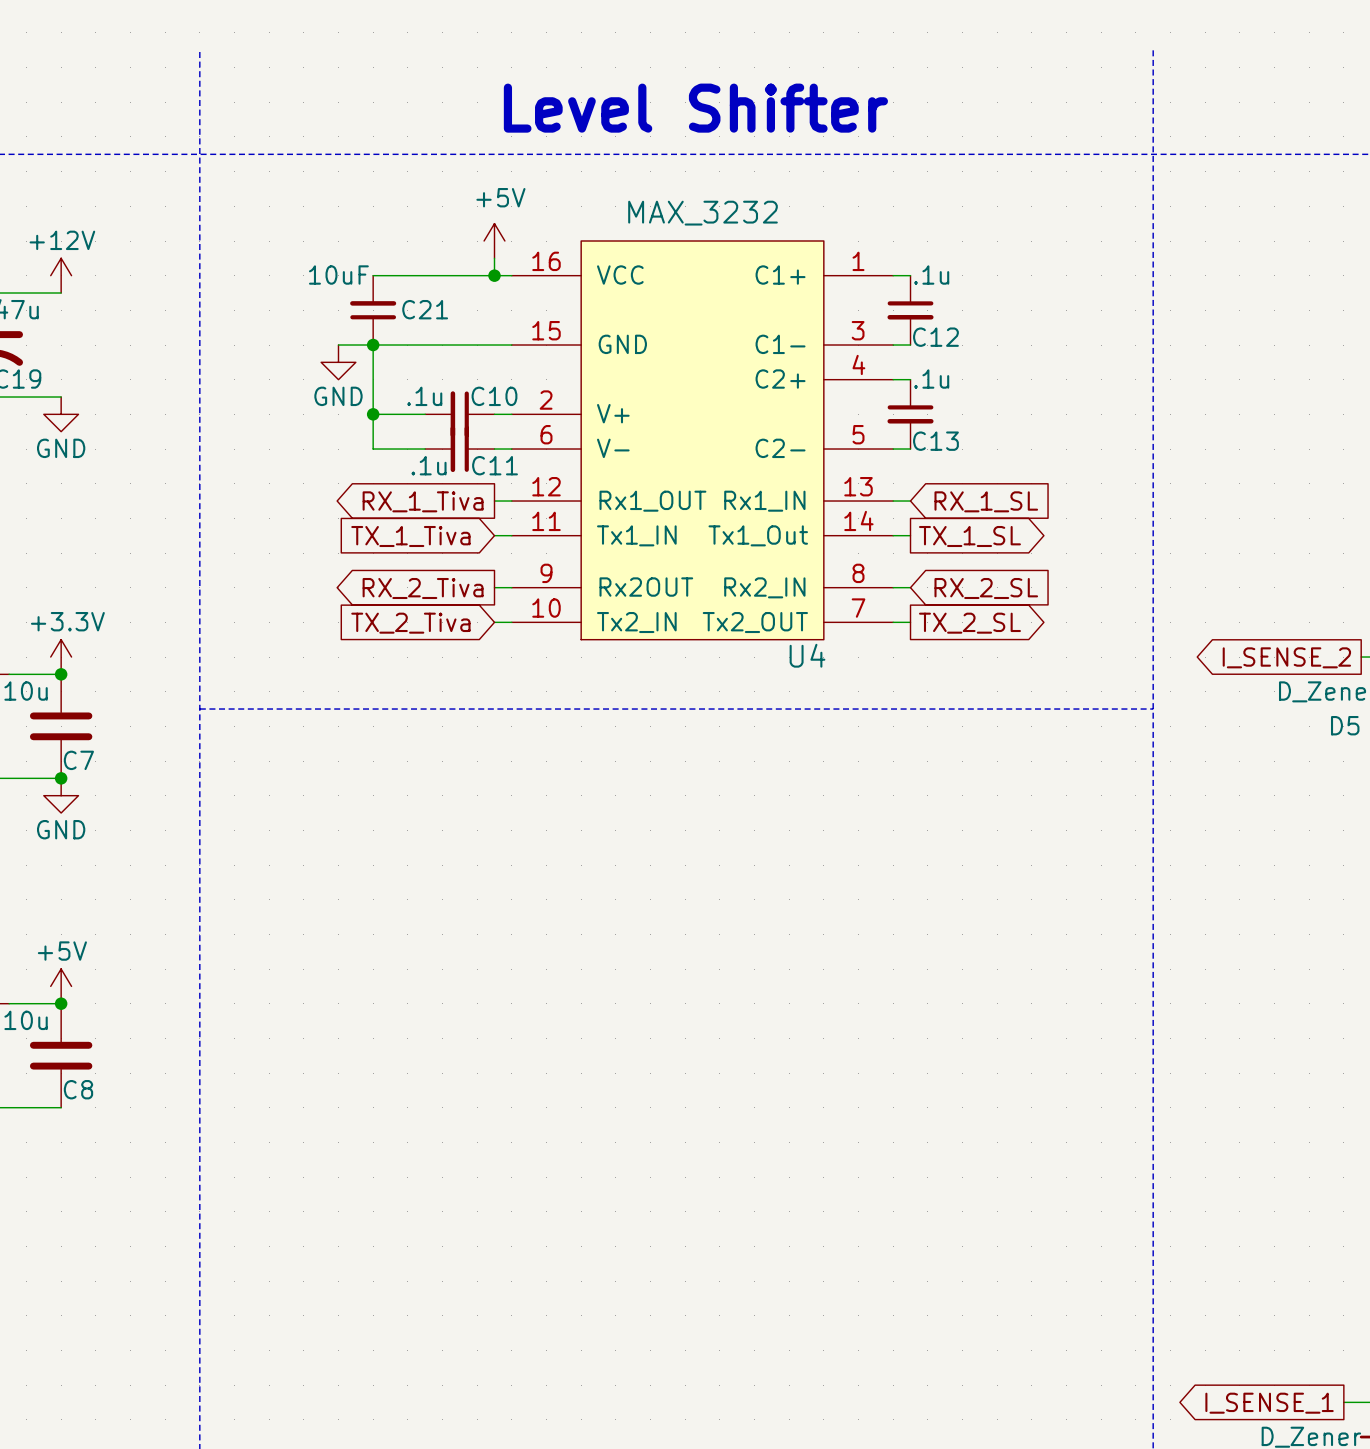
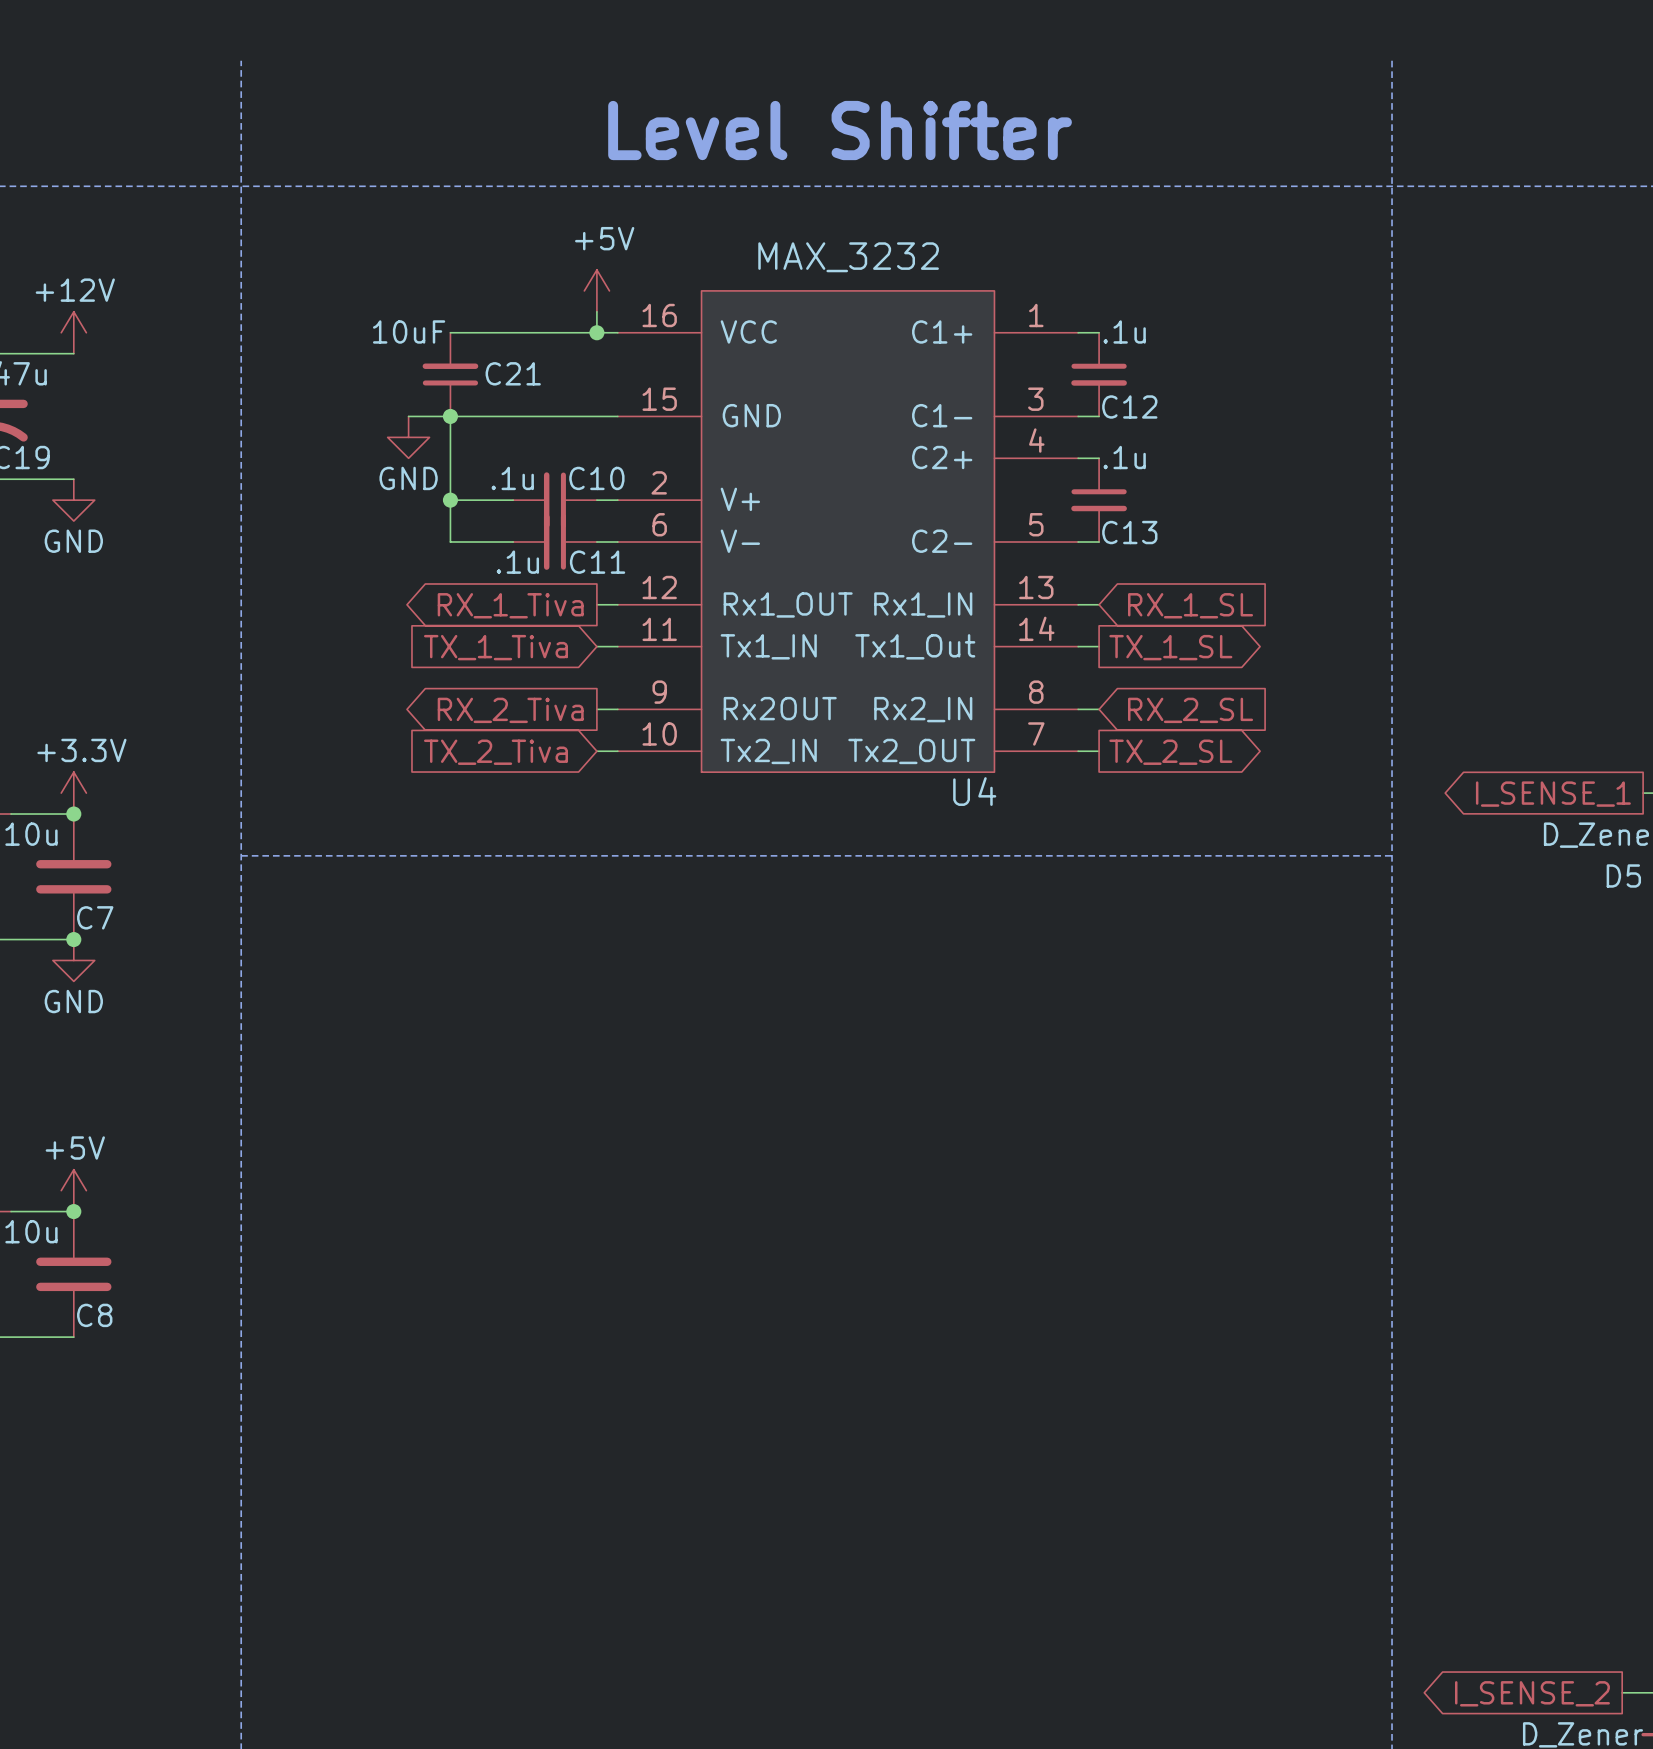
global label: I_SENSE_2 (1286, 657) -> I_SENSE_1 (1553, 794)
global label: I_SENSE_1 (1269, 1403) -> I_SENSE_2 (1532, 1693)

